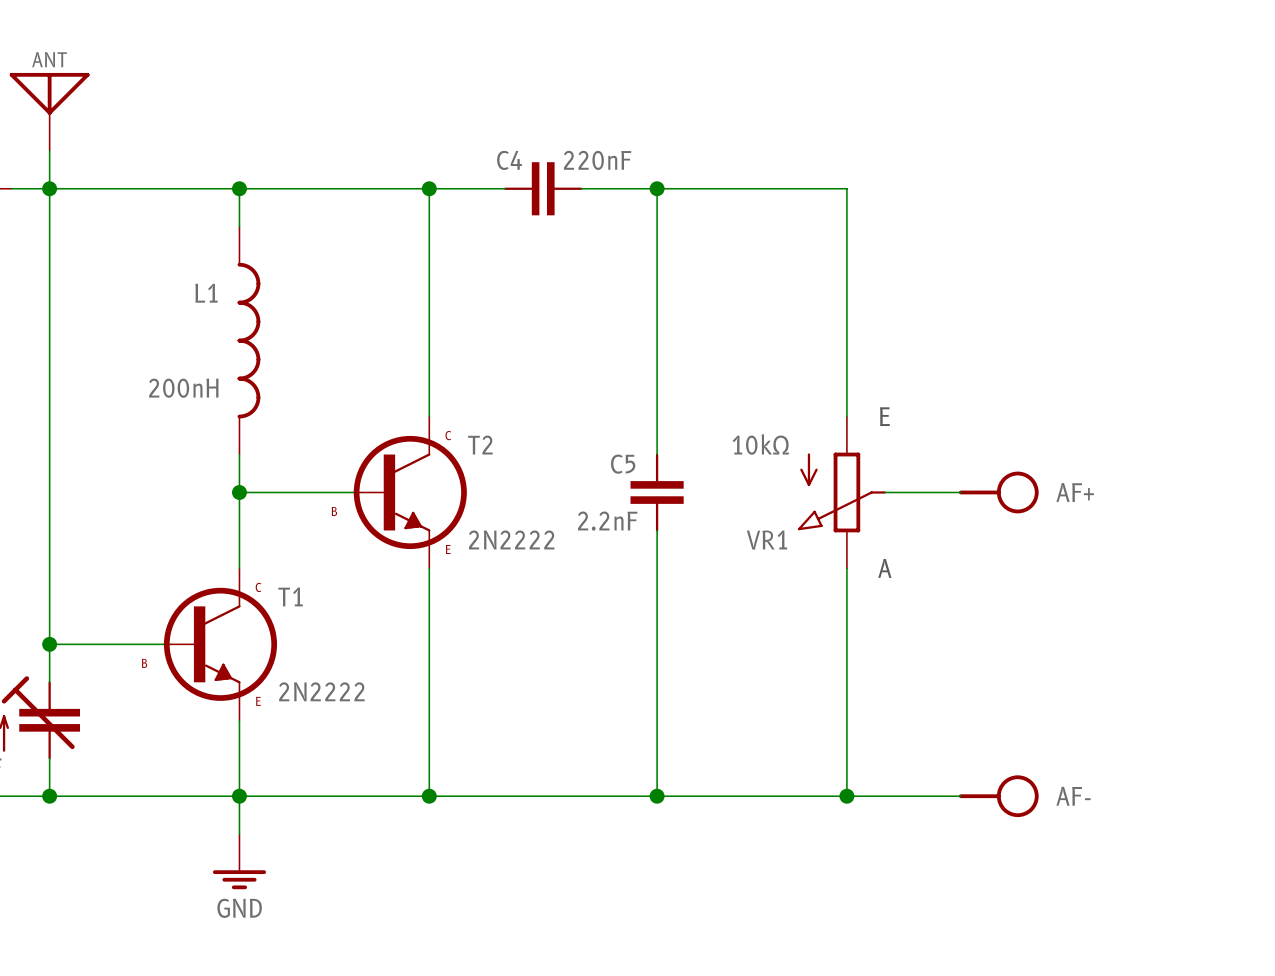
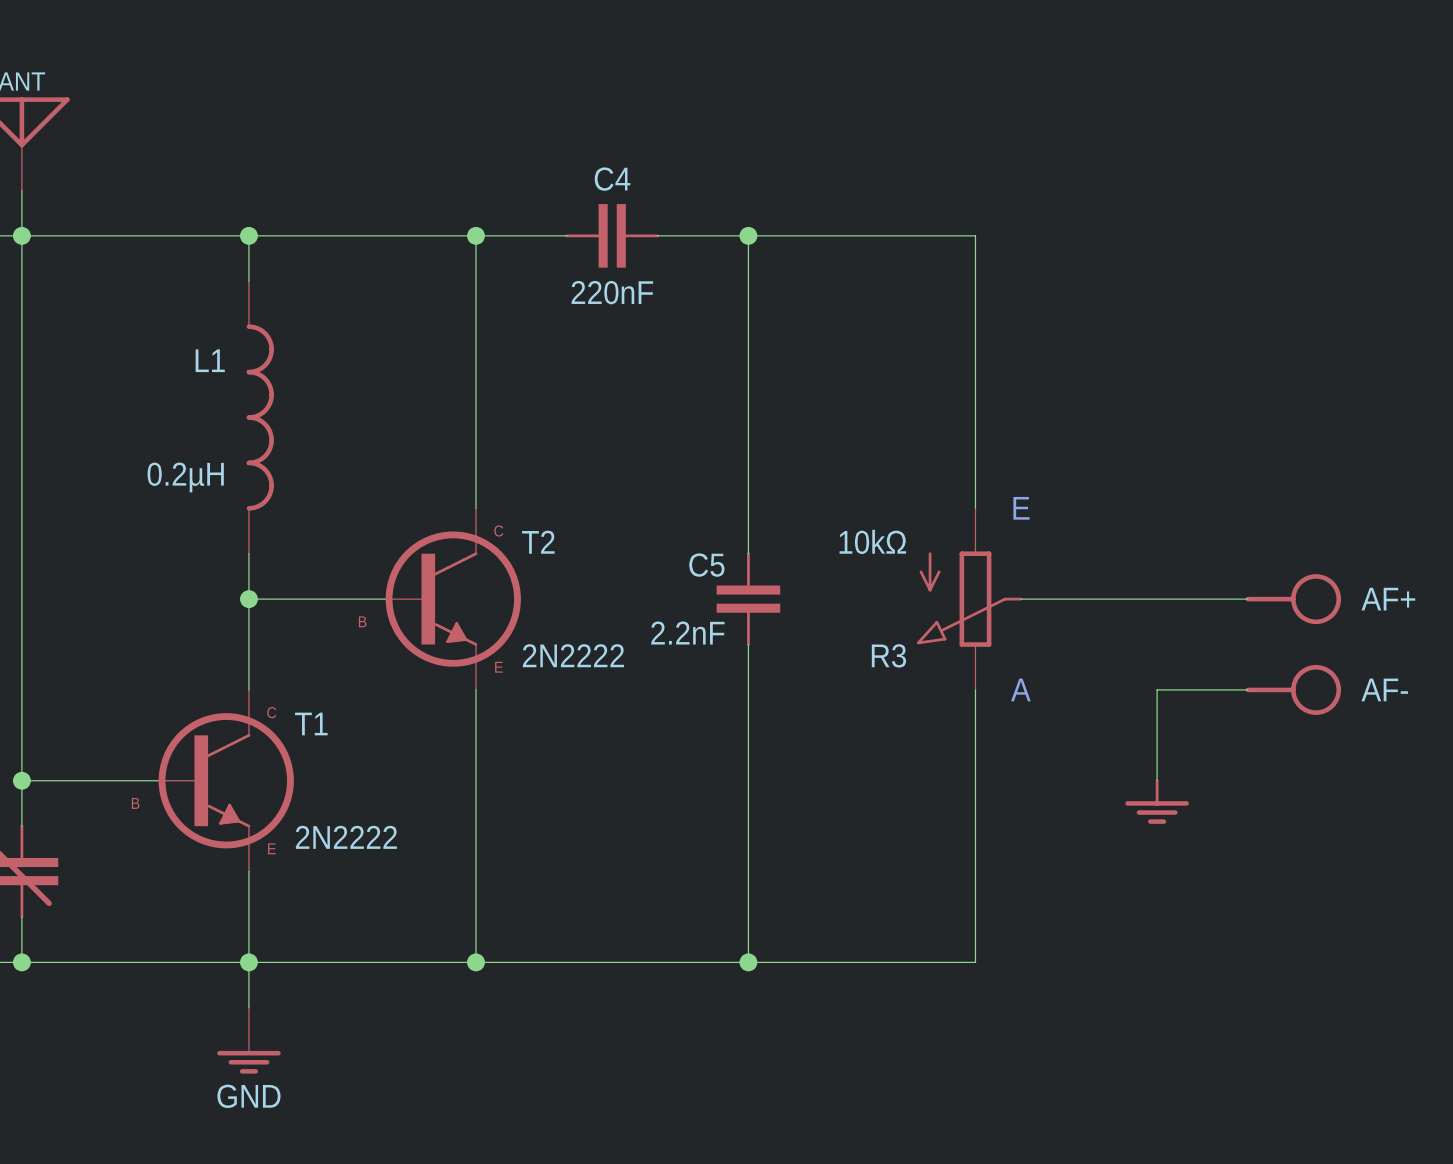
C4 name position: C4 (509, 160) -> C4 (612, 179)
C4 value position: 220nF (597, 160) -> 220nF (612, 292)
L1 value: 200nH (183, 388) -> 0.2µH (185, 477)
AF+ position: (998, 492) -> (1293, 599)
VR1 name: VR1 (767, 540) -> R3 (888, 655)
wire: none -> (1247, 689) (1157, 689) (1157, 780)
power symbol: none -> (1157, 801)
wire: (846, 796) (960, 796) -> (1111, 599) (1247, 599)
junction: (846, 796) -> none
AF- position: (998, 796) -> (1293, 689)

